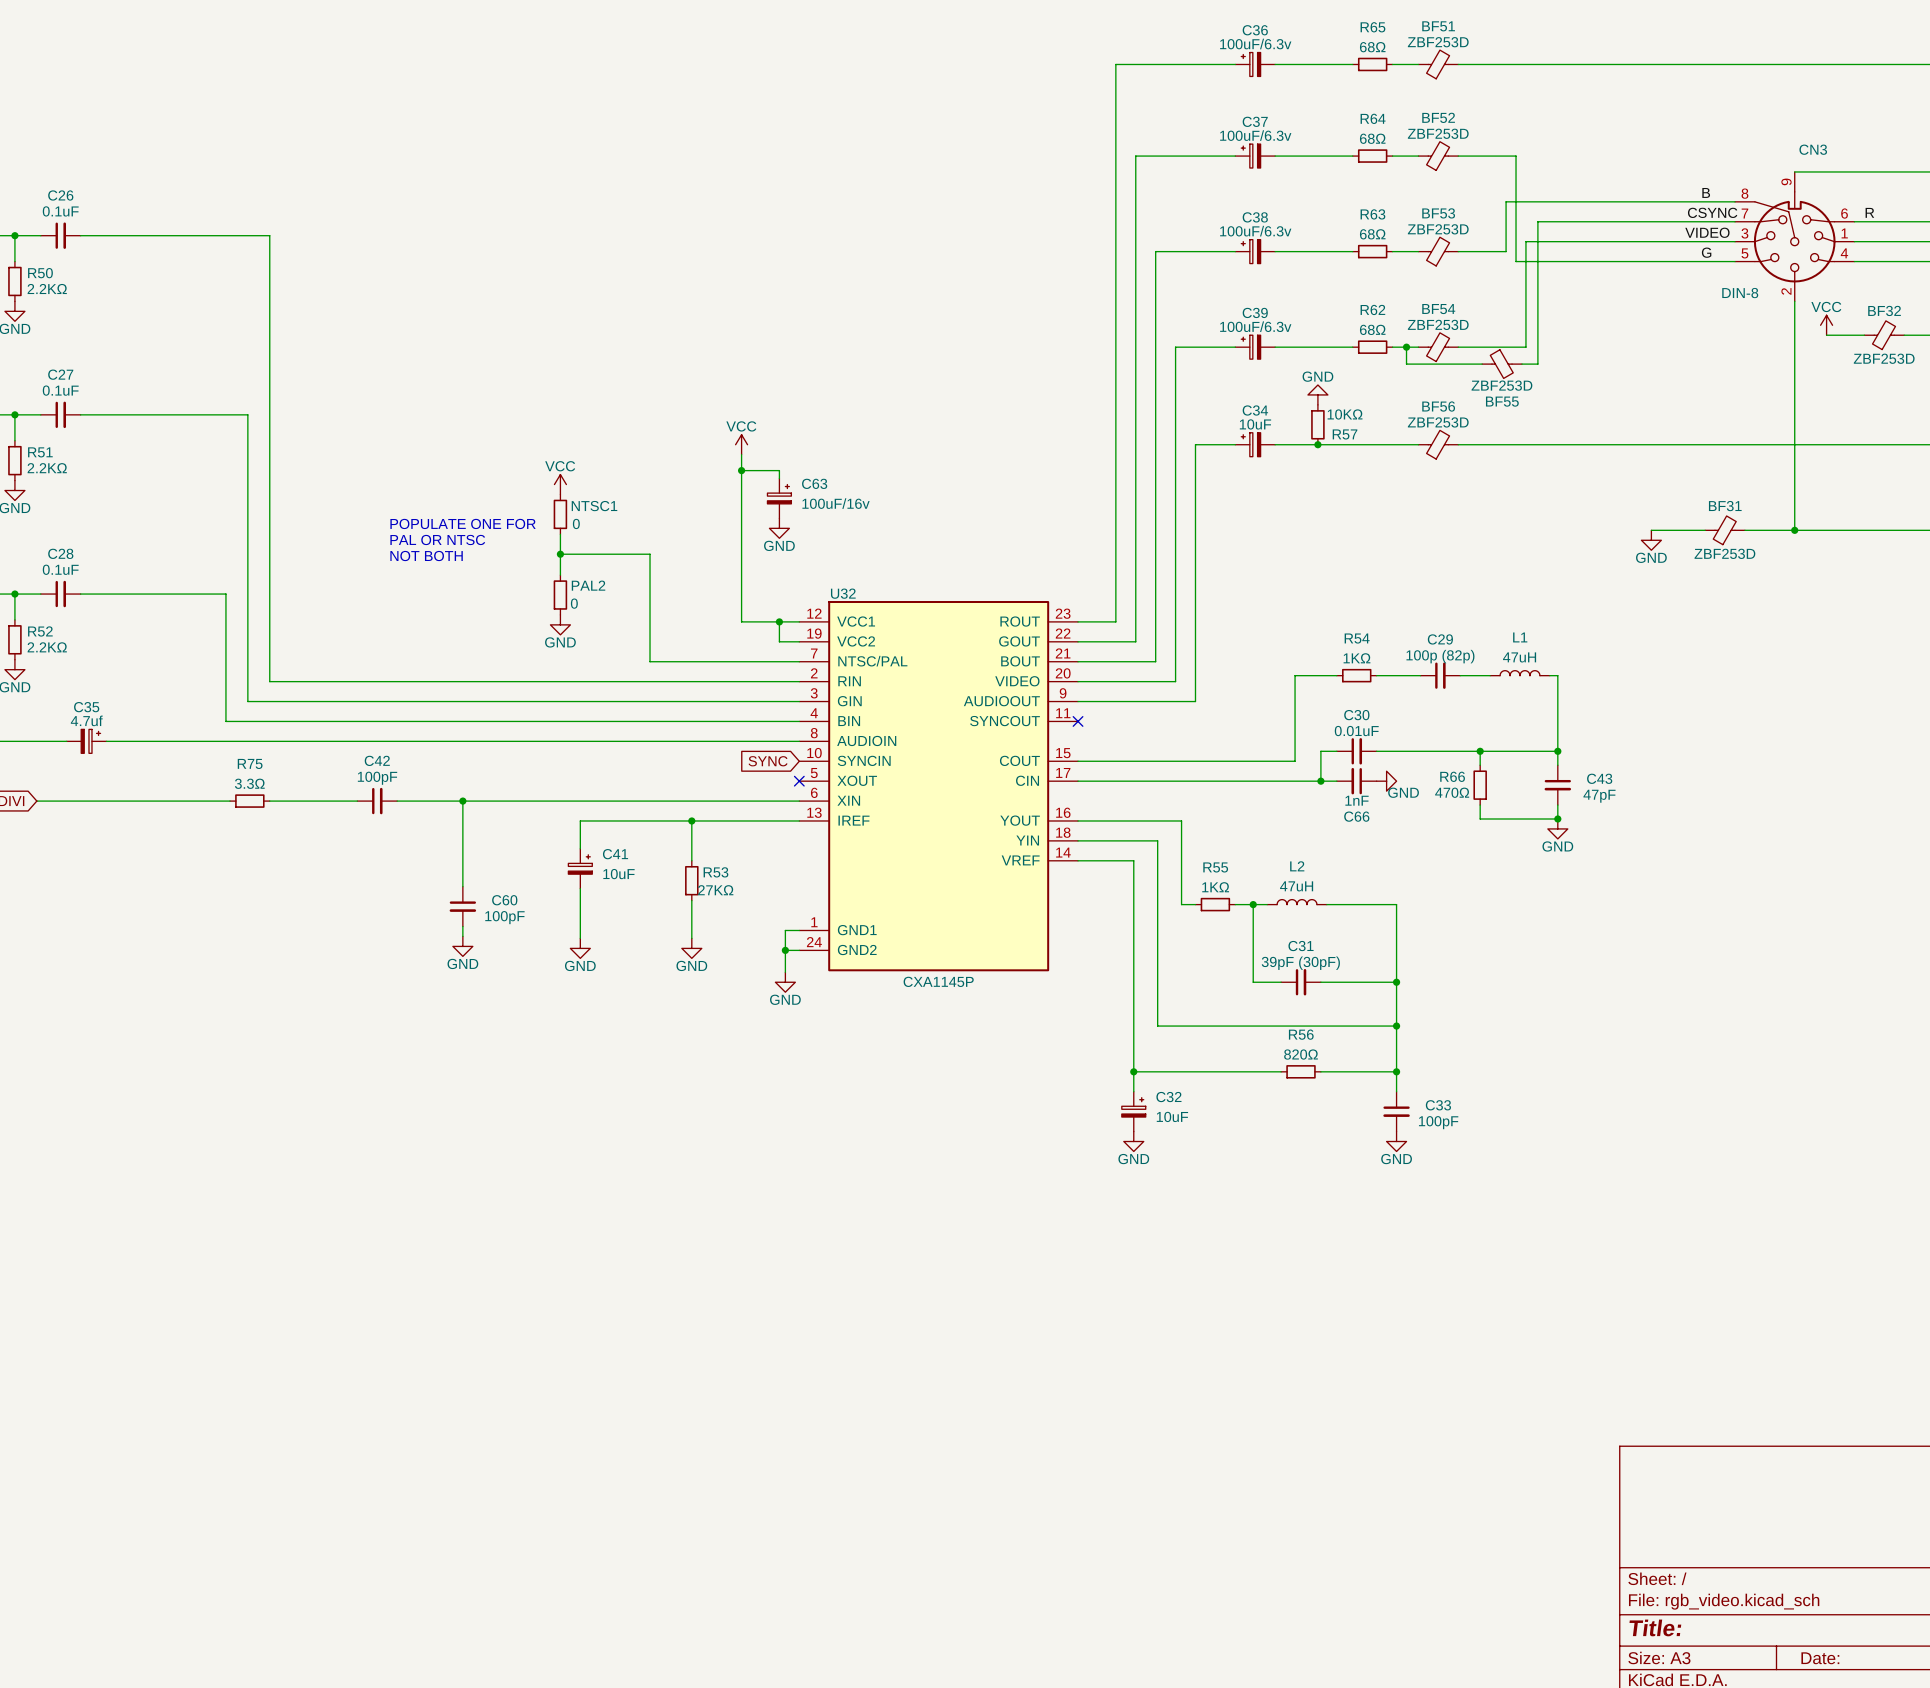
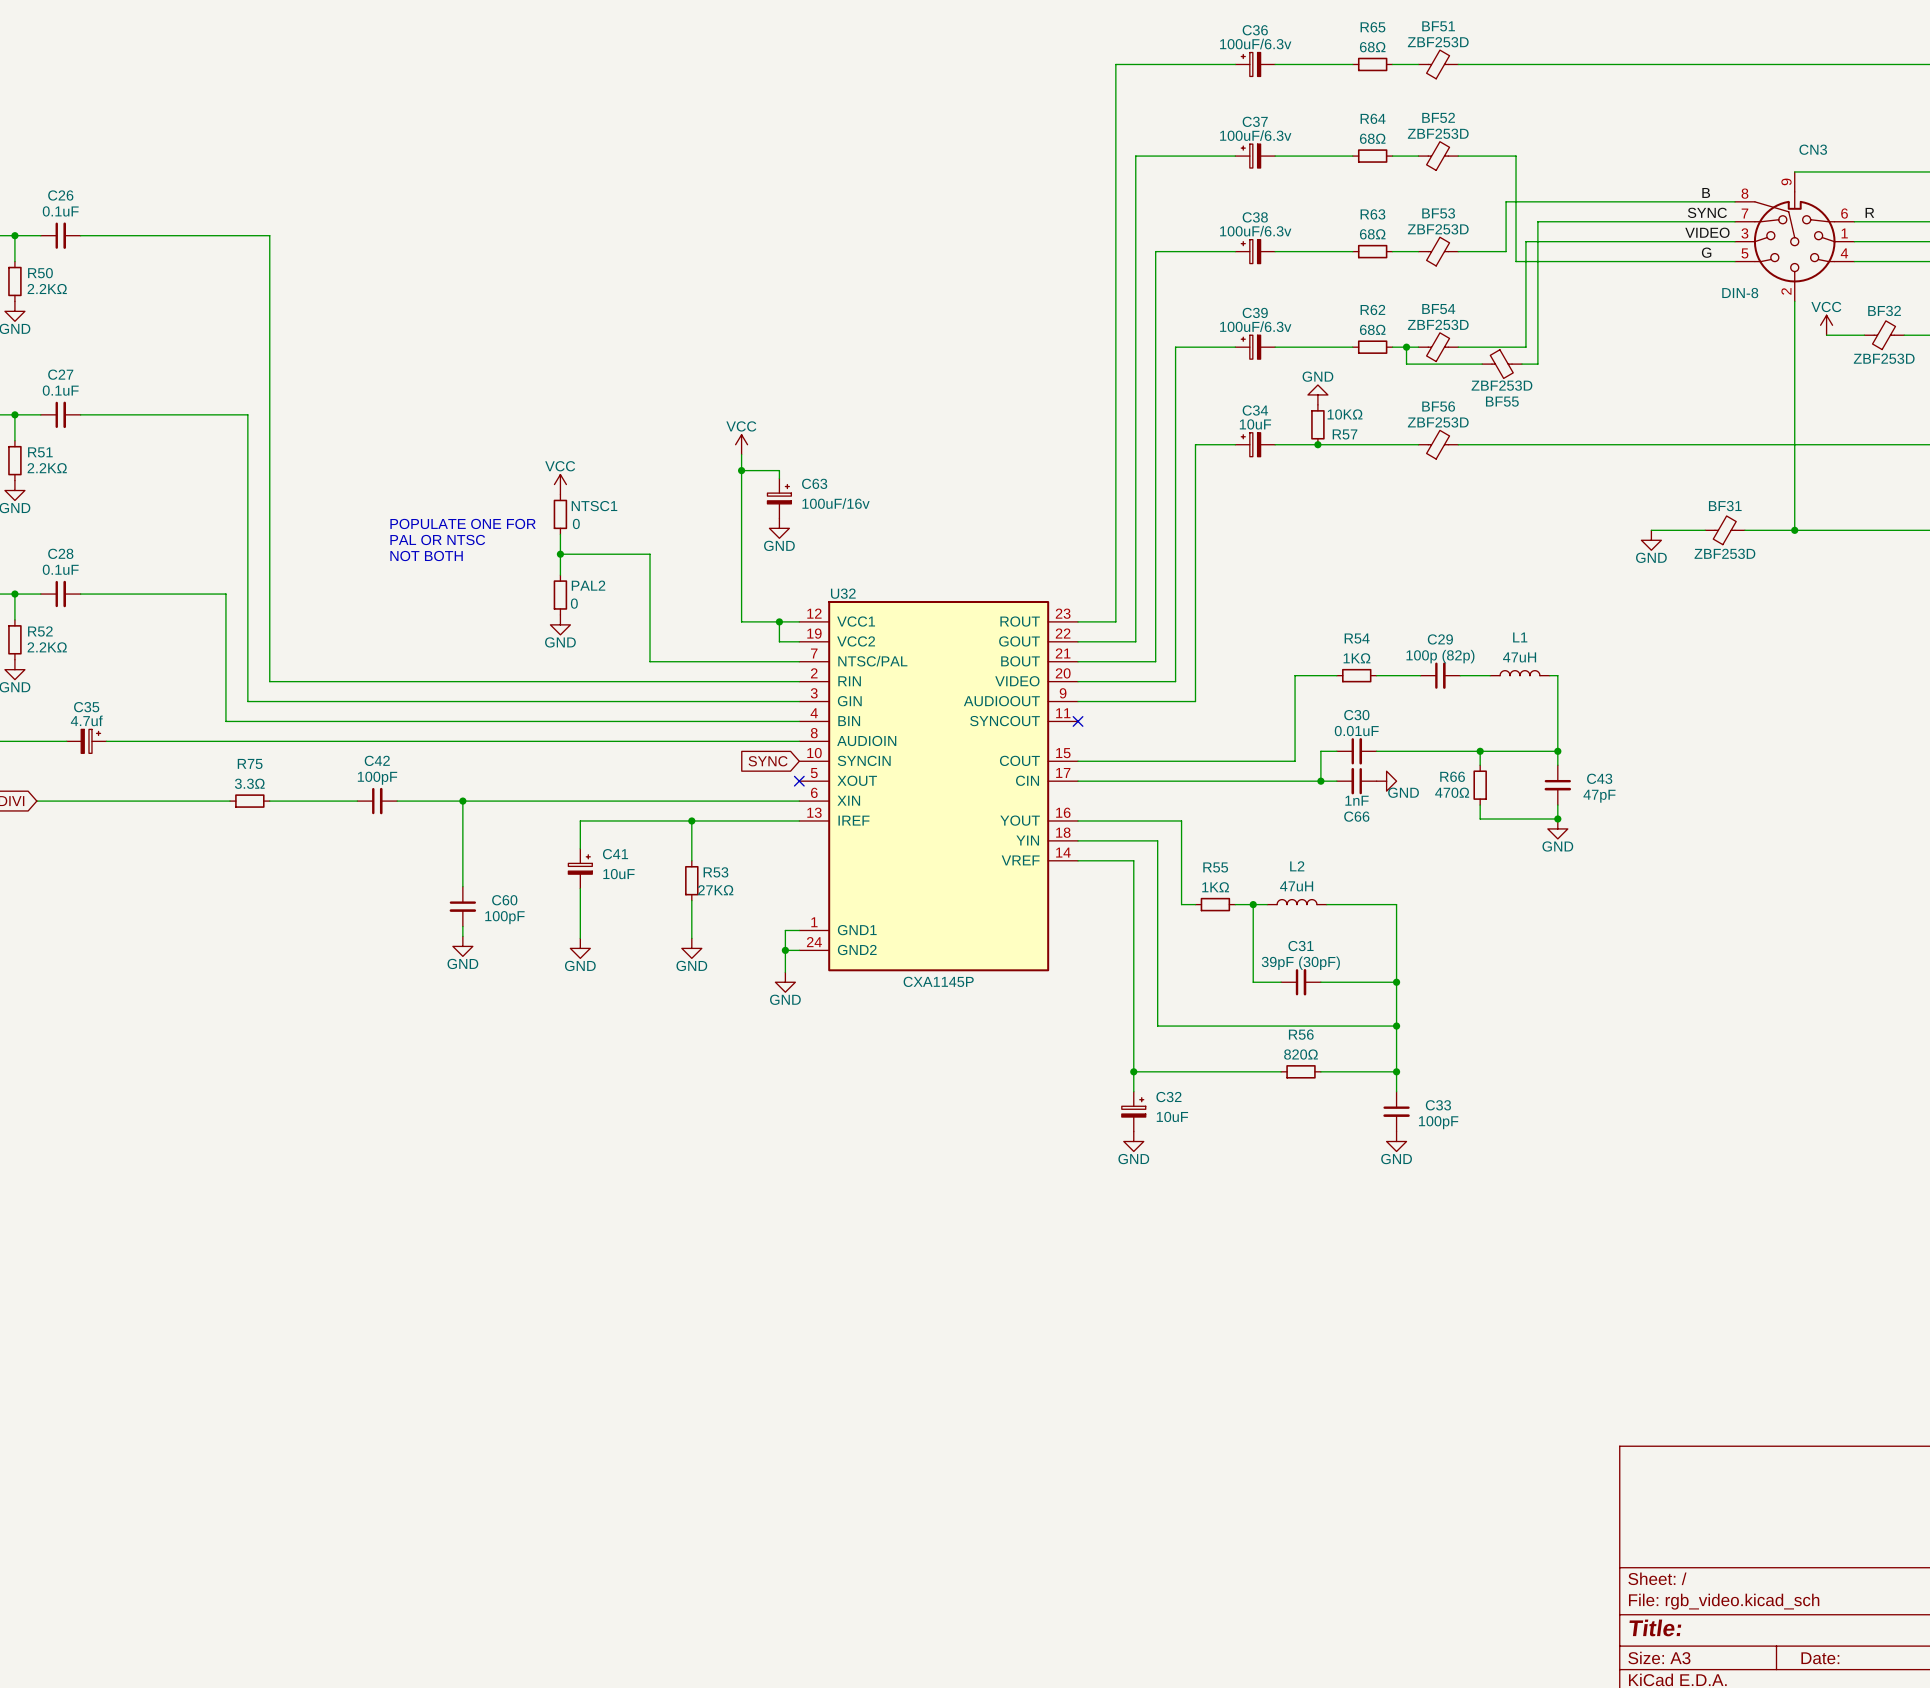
label: CSYNC (1712, 212) -> SYNC (1707, 212)

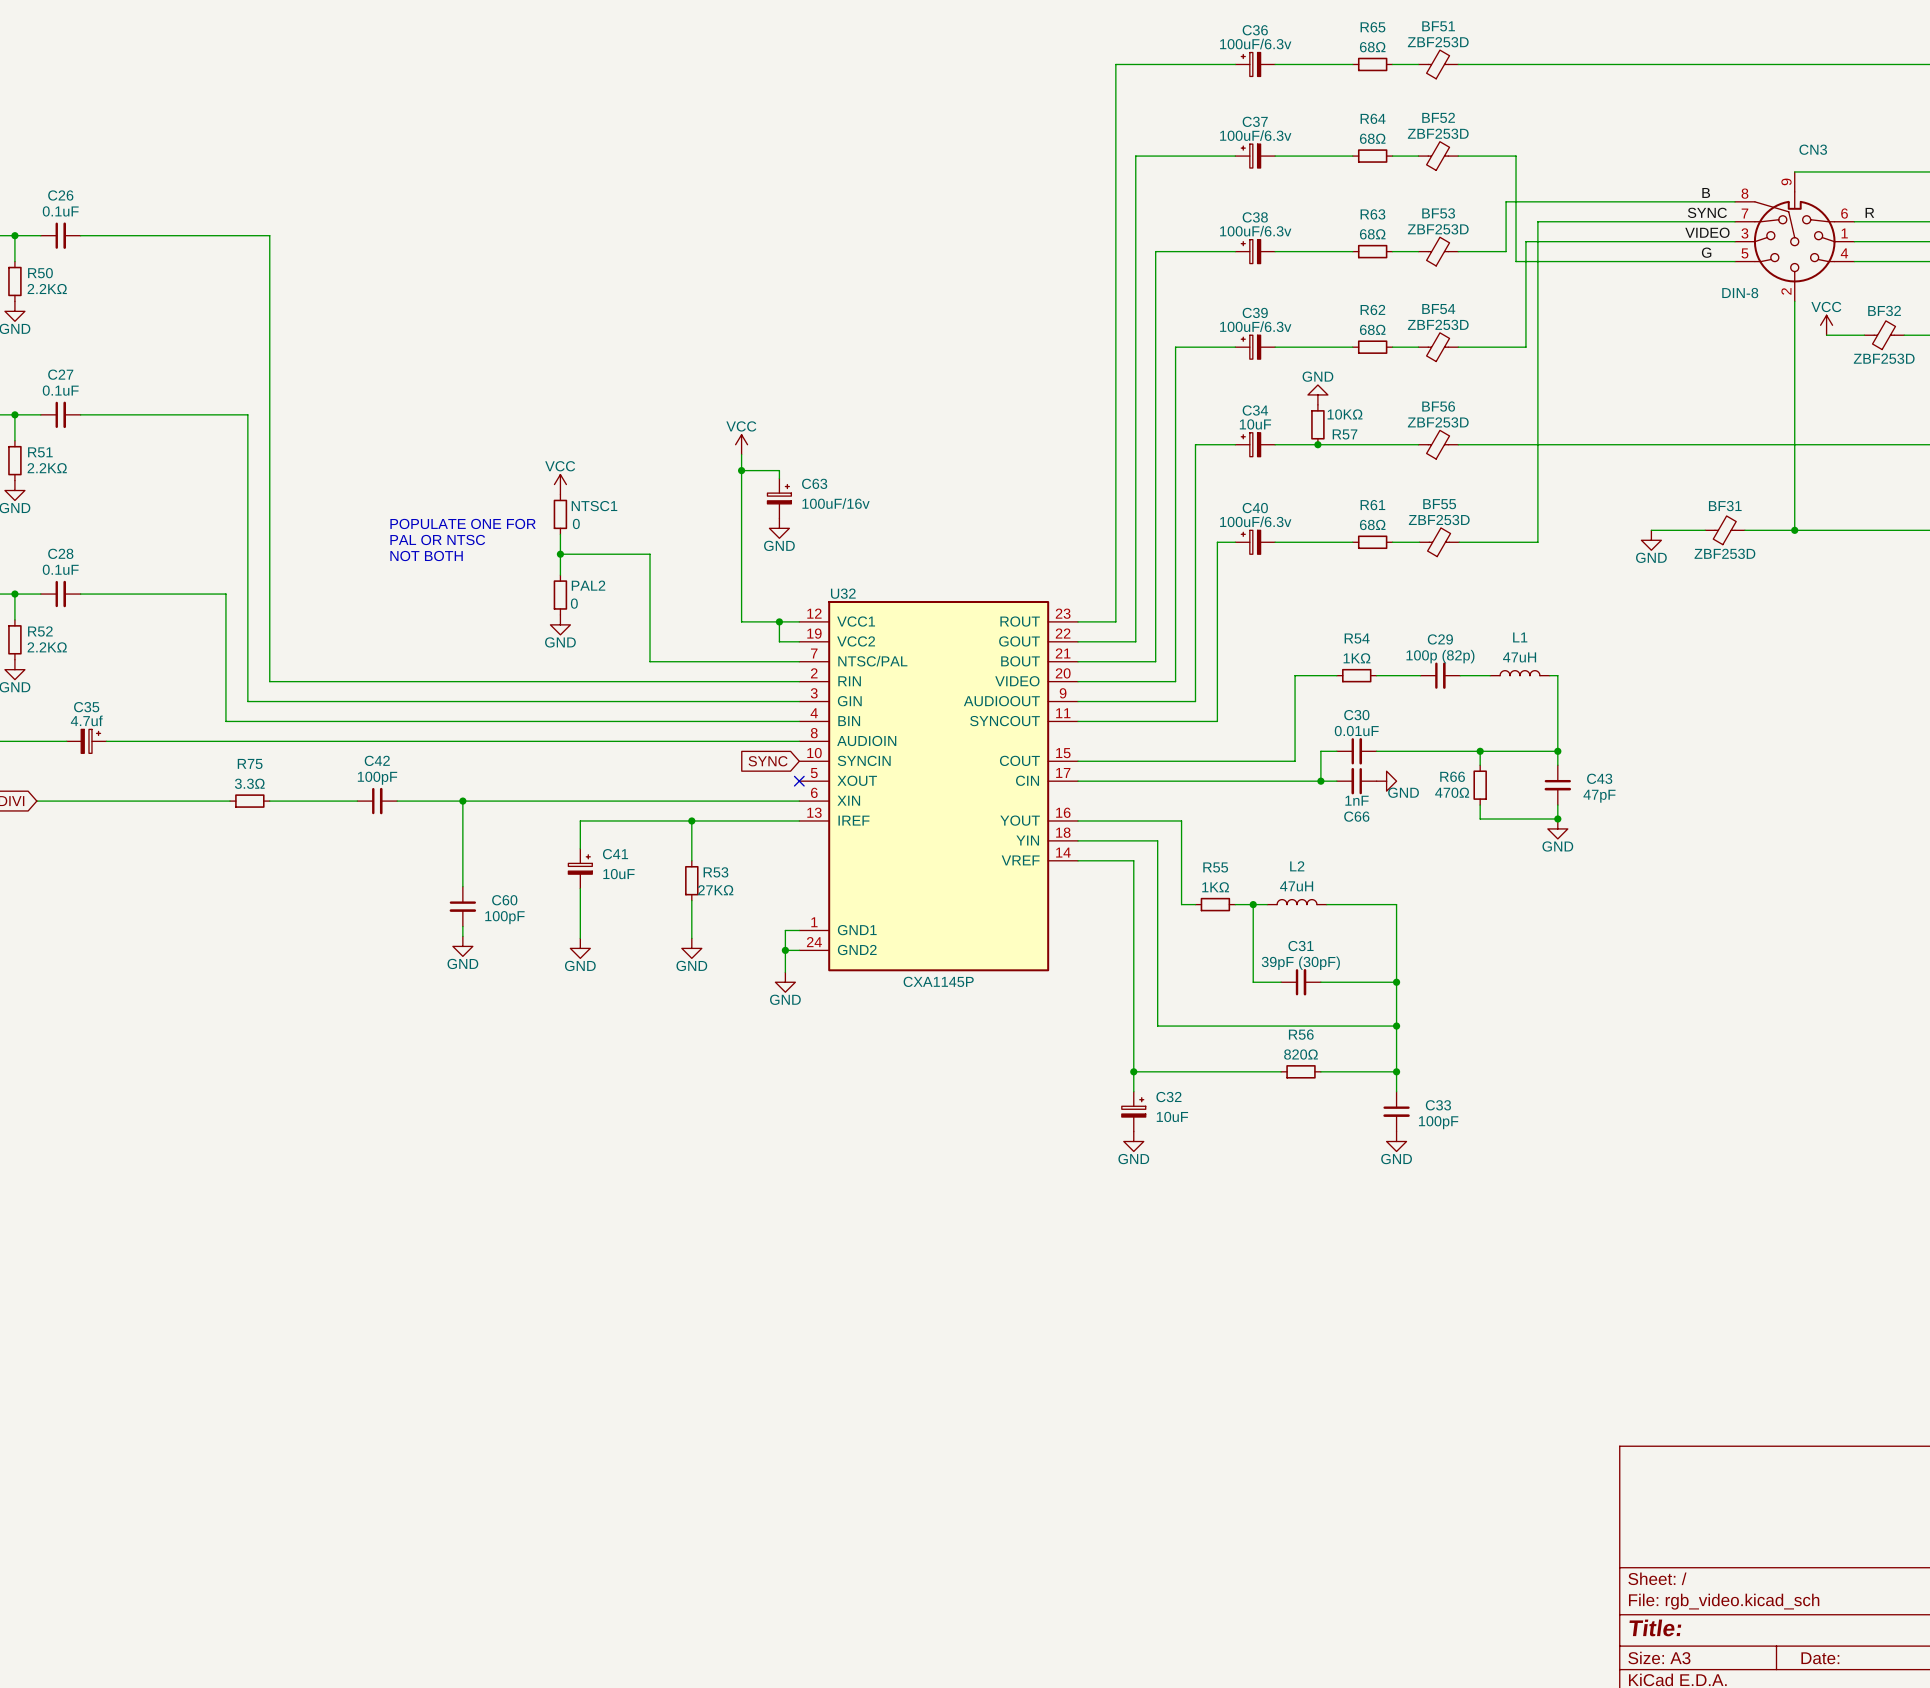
wire: (1406, 347) (1406, 364) (1482, 364) -> none
junction: (1406, 347) -> none
BF55 flip: as is (1501, 364) -> up-down (1439, 542)
BF55 position: (1502, 364) -> (1439, 542)
wire: (1521, 364) (1537, 364) -> (1459, 542) (1537, 542) (1537, 364)
wire: none -> (1235, 542) (1217, 542) (1217, 721) (1078, 721)
C40: none -> 100uF/6.3v (1255, 542)
wire: none -> (1275, 542) (1352, 542)
R61: none -> 68Ω (1372, 542)
wire: none -> (1392, 542) (1419, 542)
no-connect mark: (1078, 721) -> none

